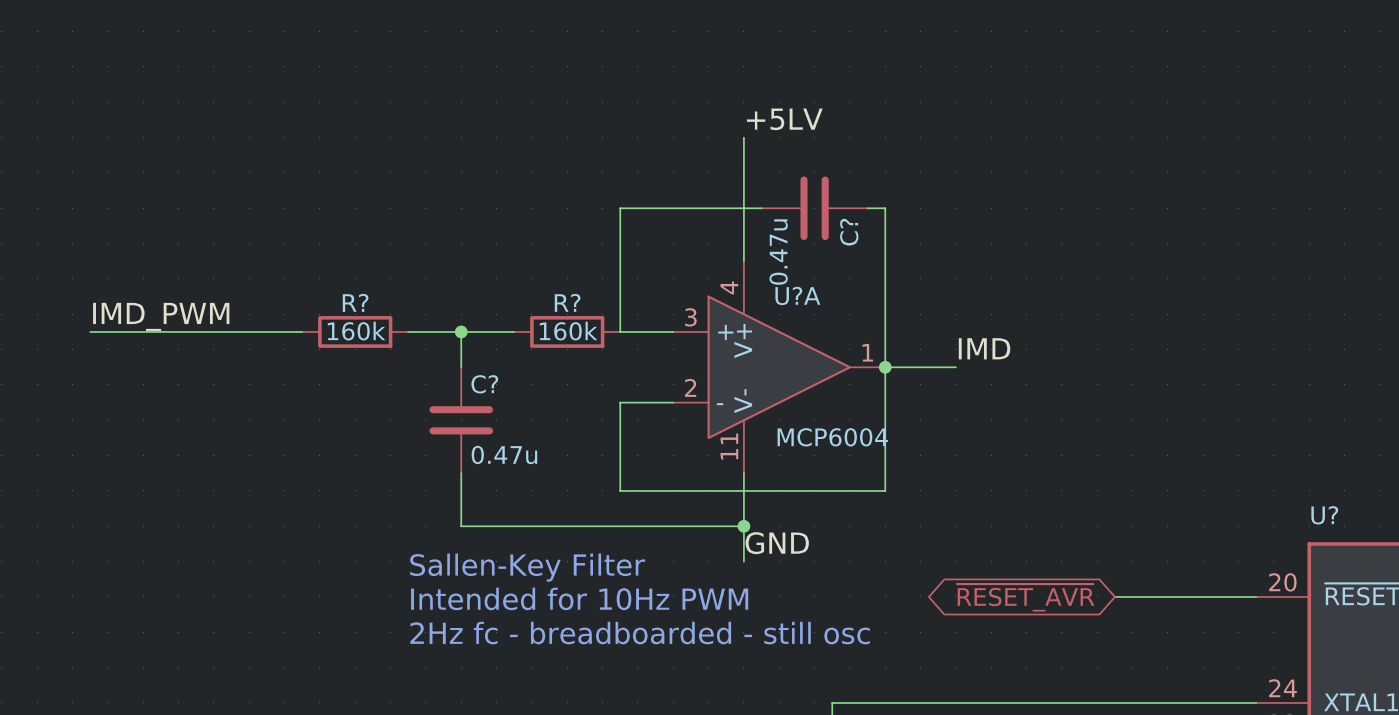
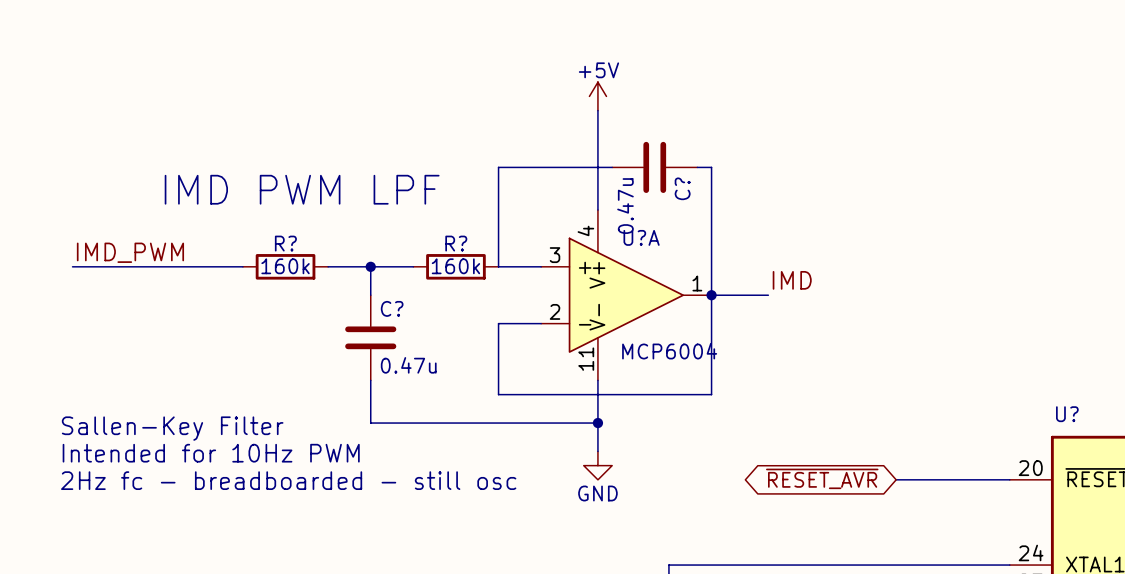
power symbol: none -> +5V (597, 96)
label: +5LV (784, 119) -> none
text: none -> IMD PWM LPF (302, 189)
label: GND (777, 543) -> none
text position: Sallen-Key Filter (527, 567) -> Sallen-Key Filter (172, 428)
power symbol: none -> GND (597, 465)
text position: Intended for 10Hz PWM (579, 598) -> Intended for 10Hz PWM (211, 453)
text position: 2Hz fc - breadboarded - still osc (640, 633) -> 2Hz fc - breadboarded - still osc (288, 480)

